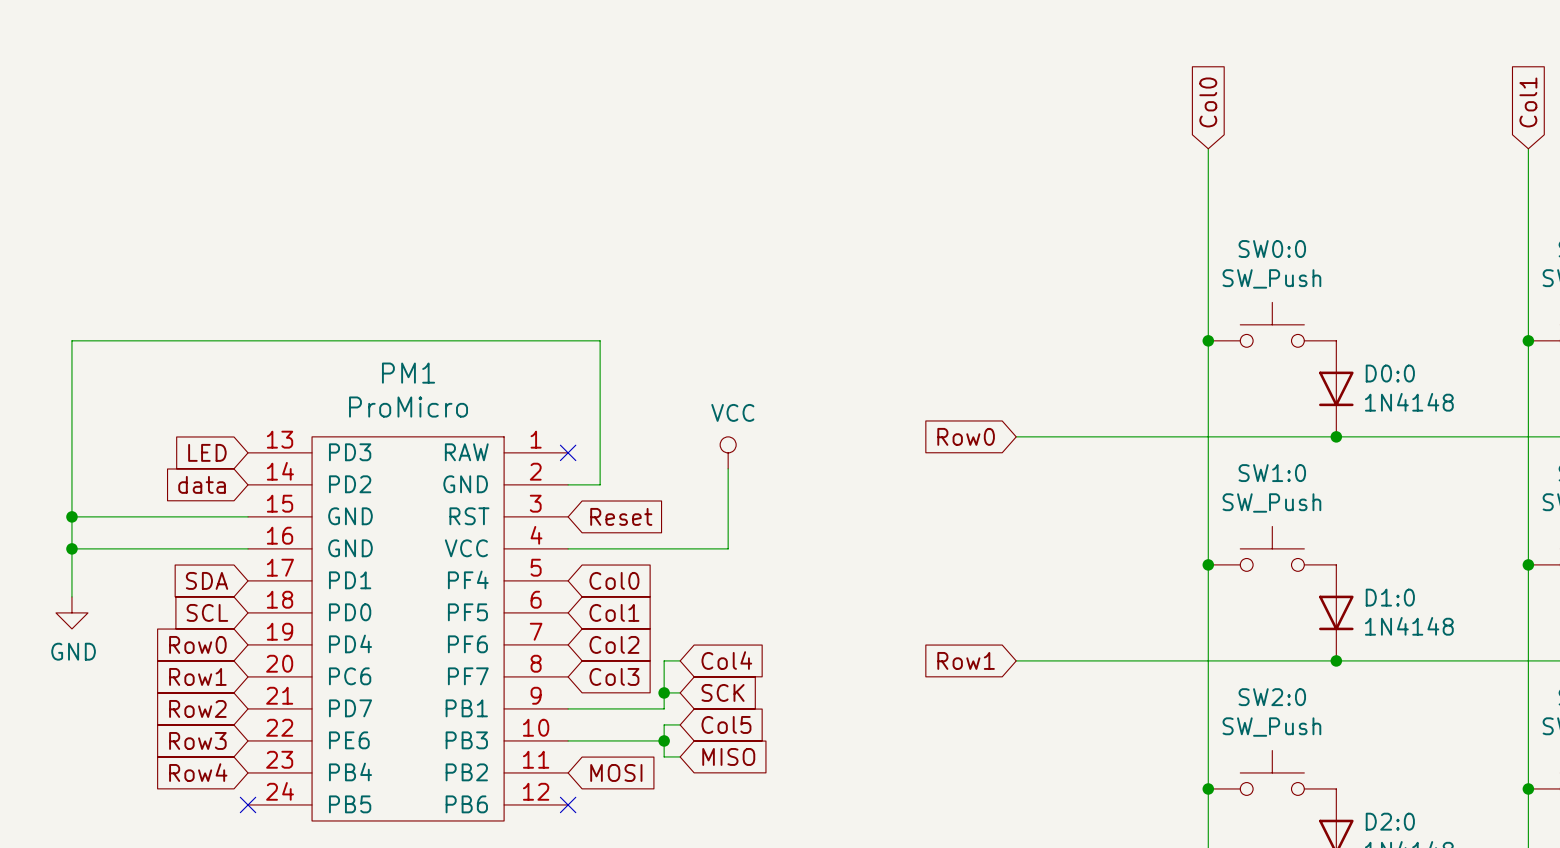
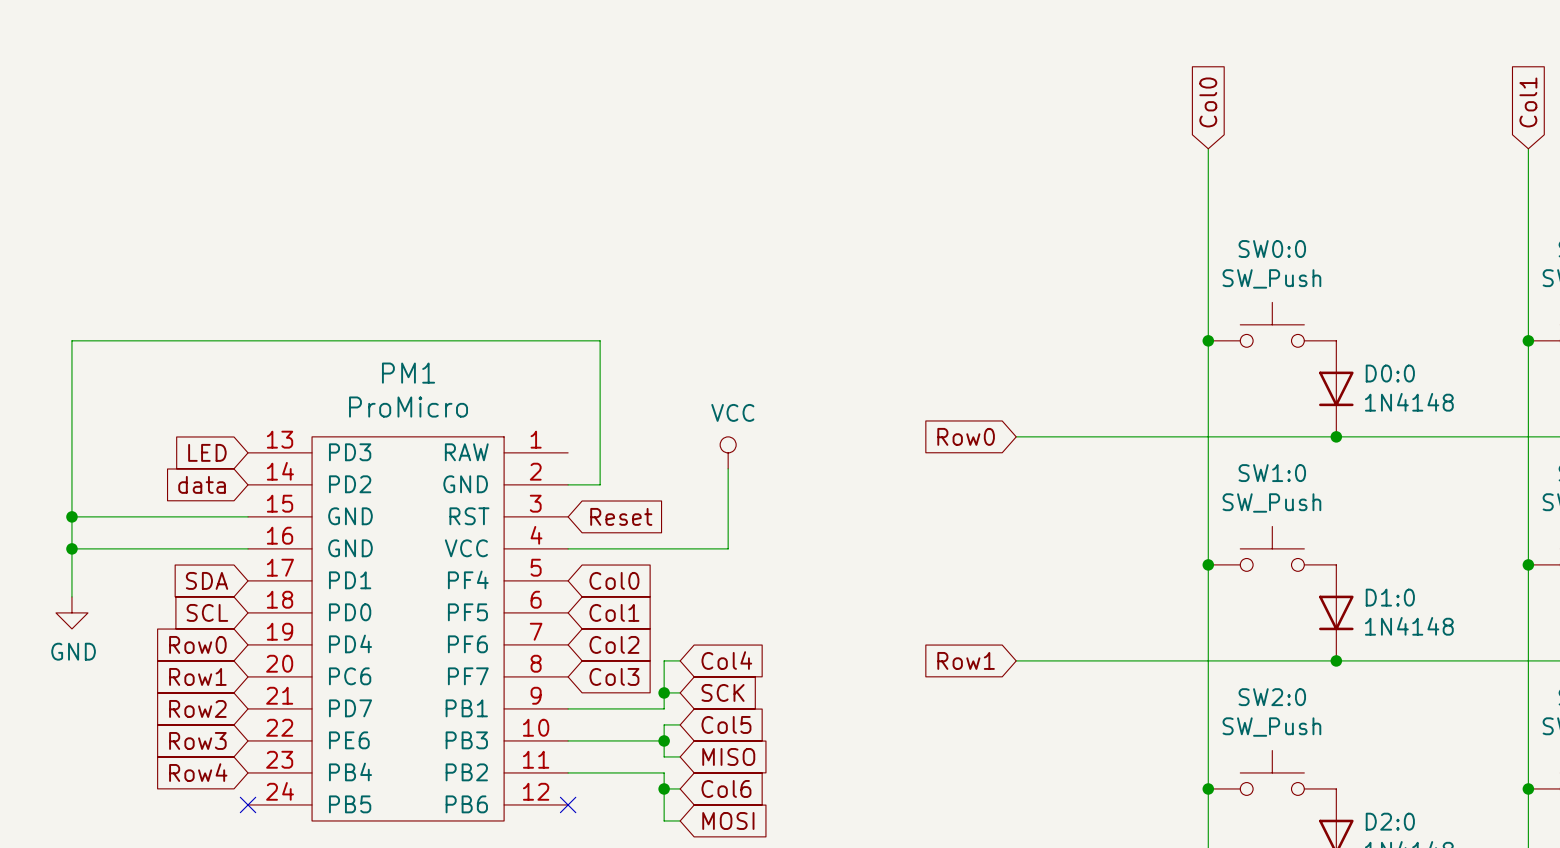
no-connect mark: (568, 452) -> none
wire: none -> (568, 772) (664, 772) (664, 820) (680, 820)
global label position: MOSI (616, 772) -> MOSI (728, 820)
wire: none -> (664, 788) (680, 788)
junction: none -> (664, 788)
global label: none -> Col6 (726, 788)

